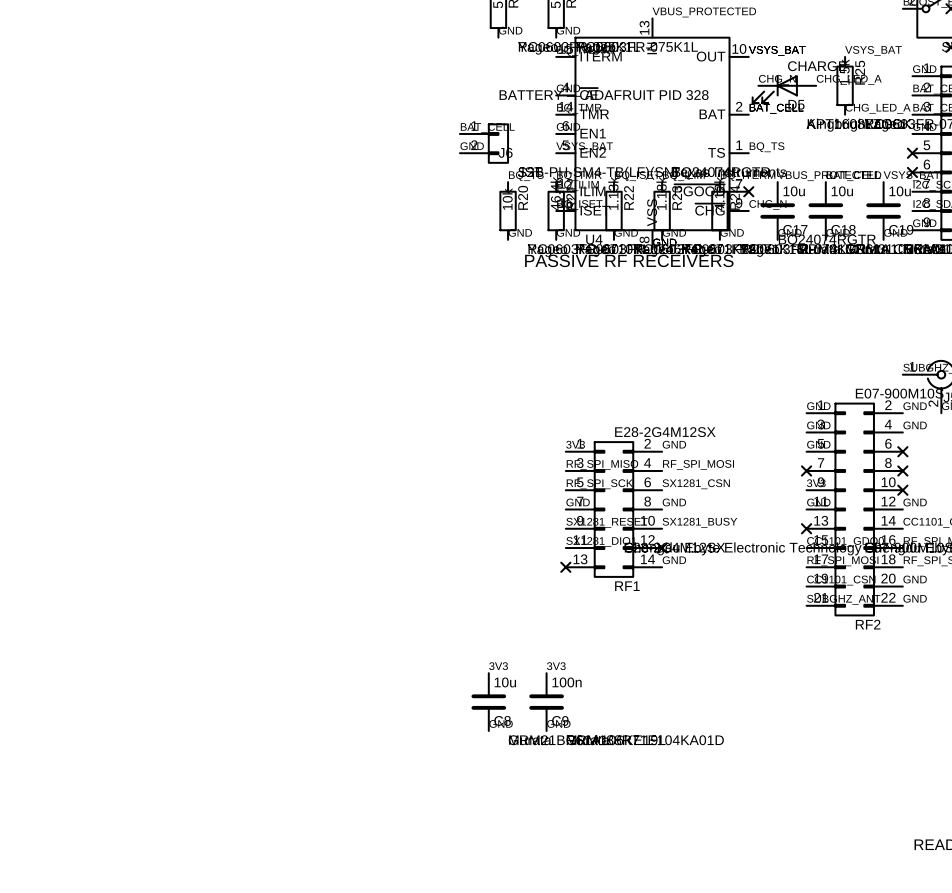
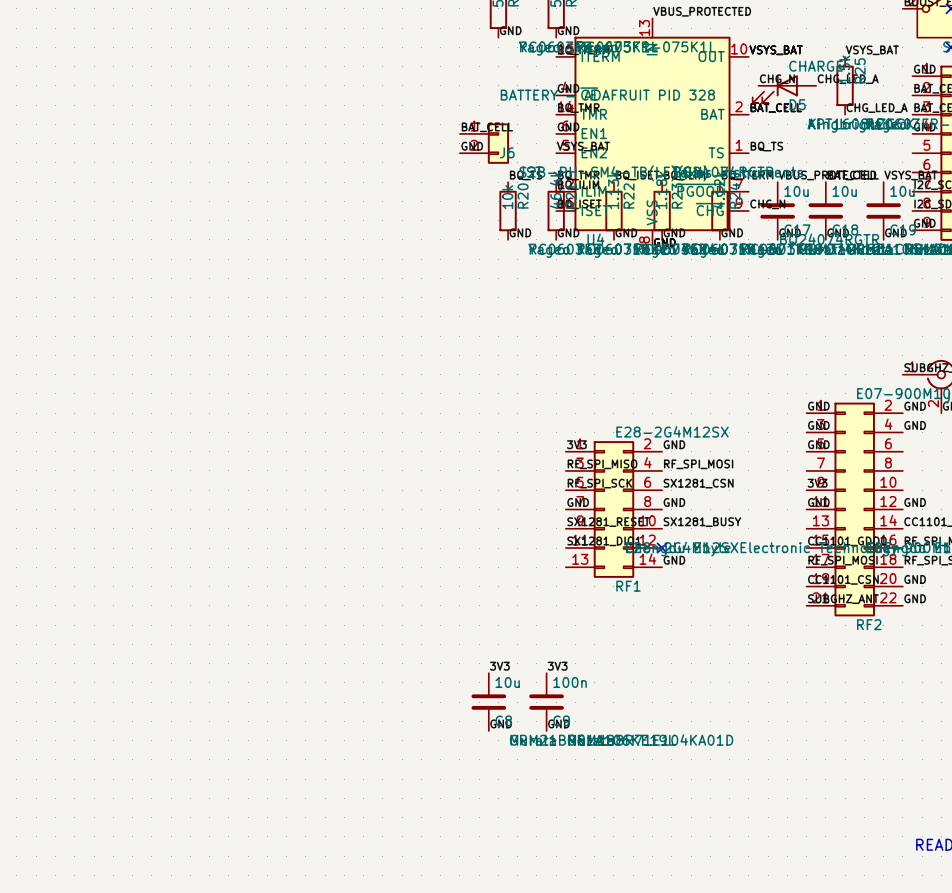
no-connect mark: (912, 153) -> none
no-connect mark: (912, 172) -> none
no-connect mark: (748, 191) -> none
text: PASSIVE RF RECEIVERS (629, 260) -> none
no-connect mark: (902, 451) -> none
no-connect mark: (806, 470) -> none
no-connect mark: (902, 470) -> none
no-connect mark: (902, 490) -> none
no-connect mark: (806, 528) -> none
no-connect mark: (565, 567) -> none

